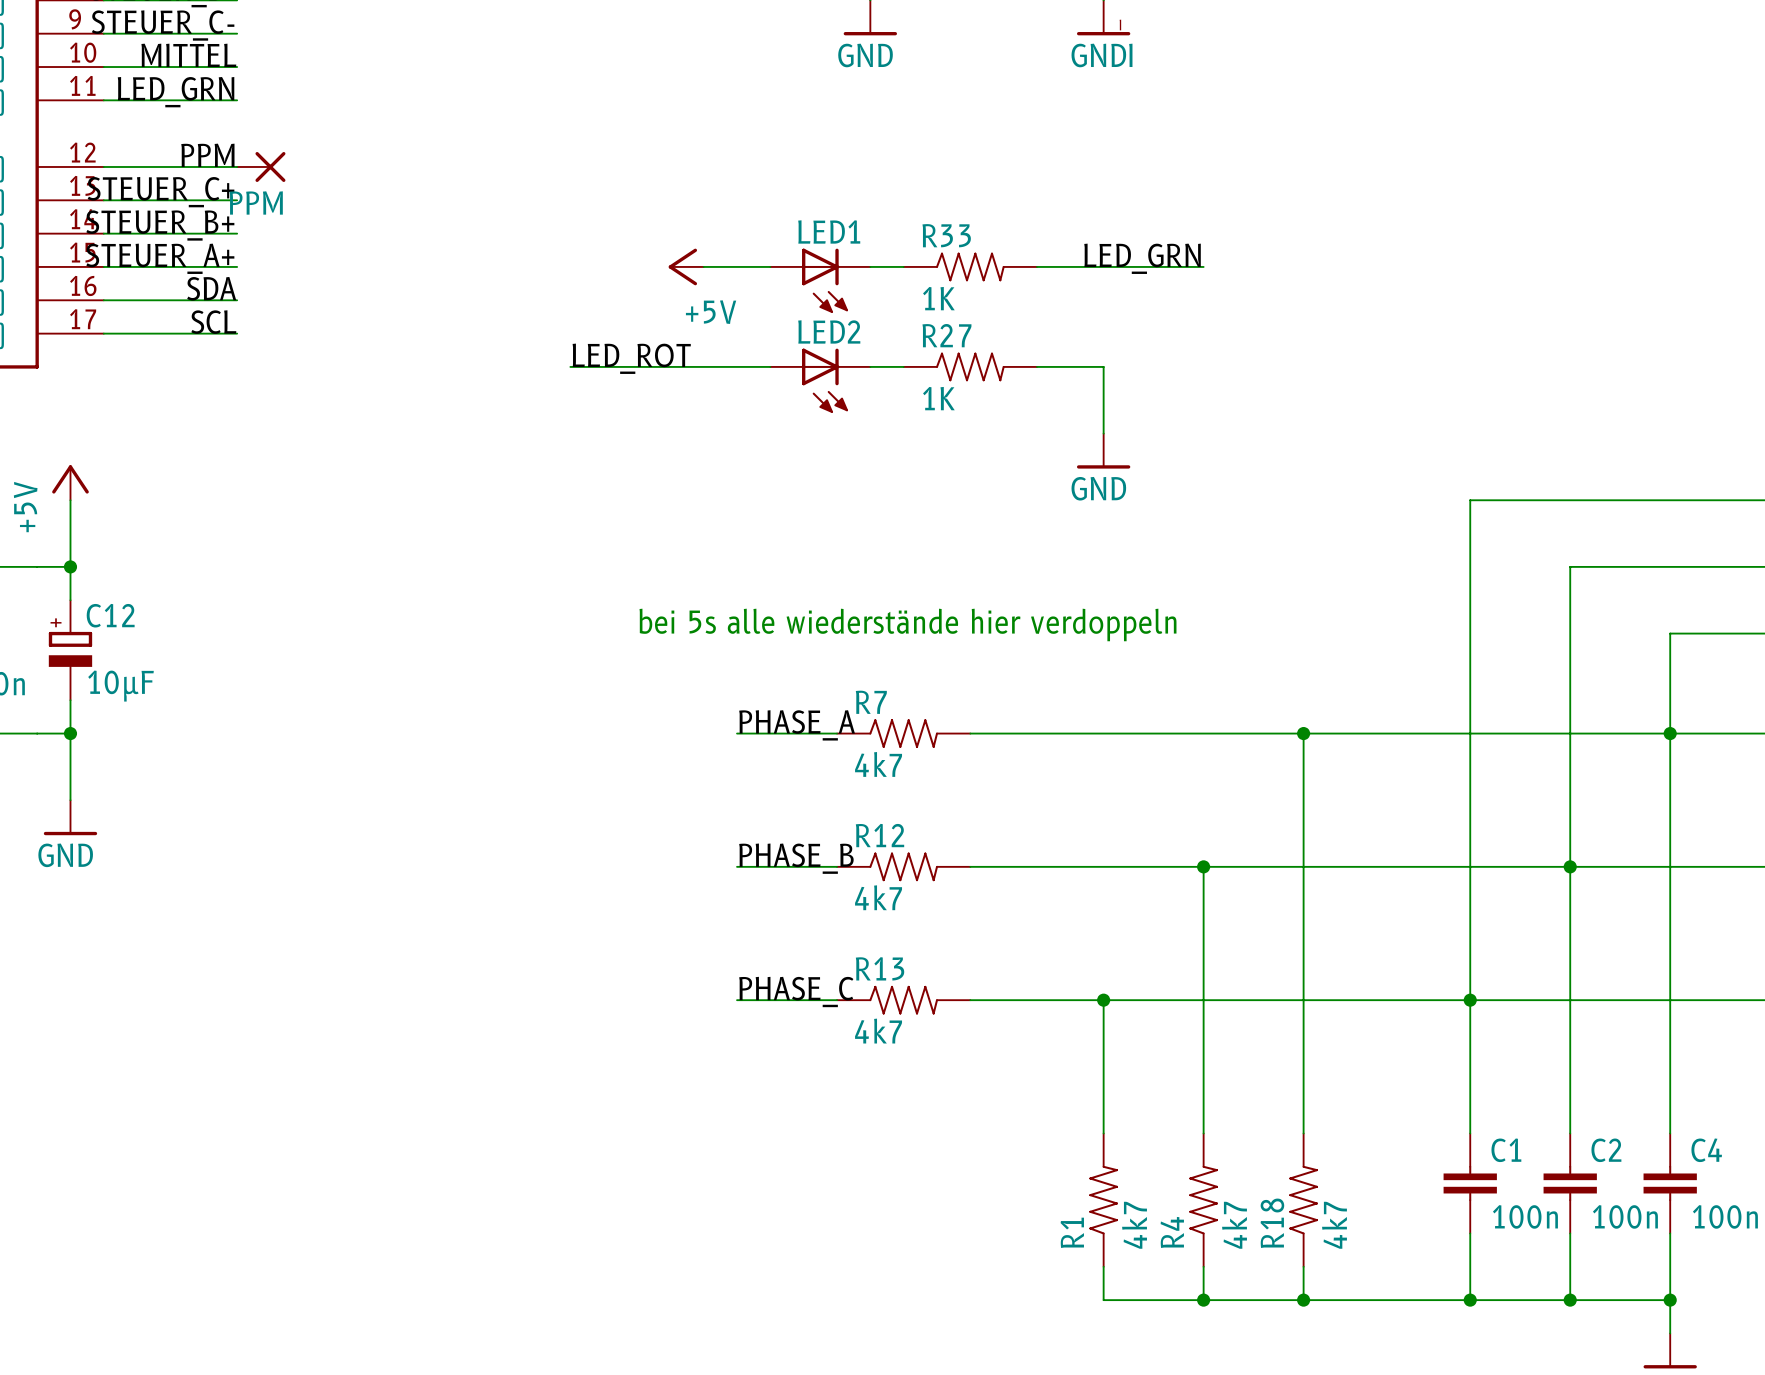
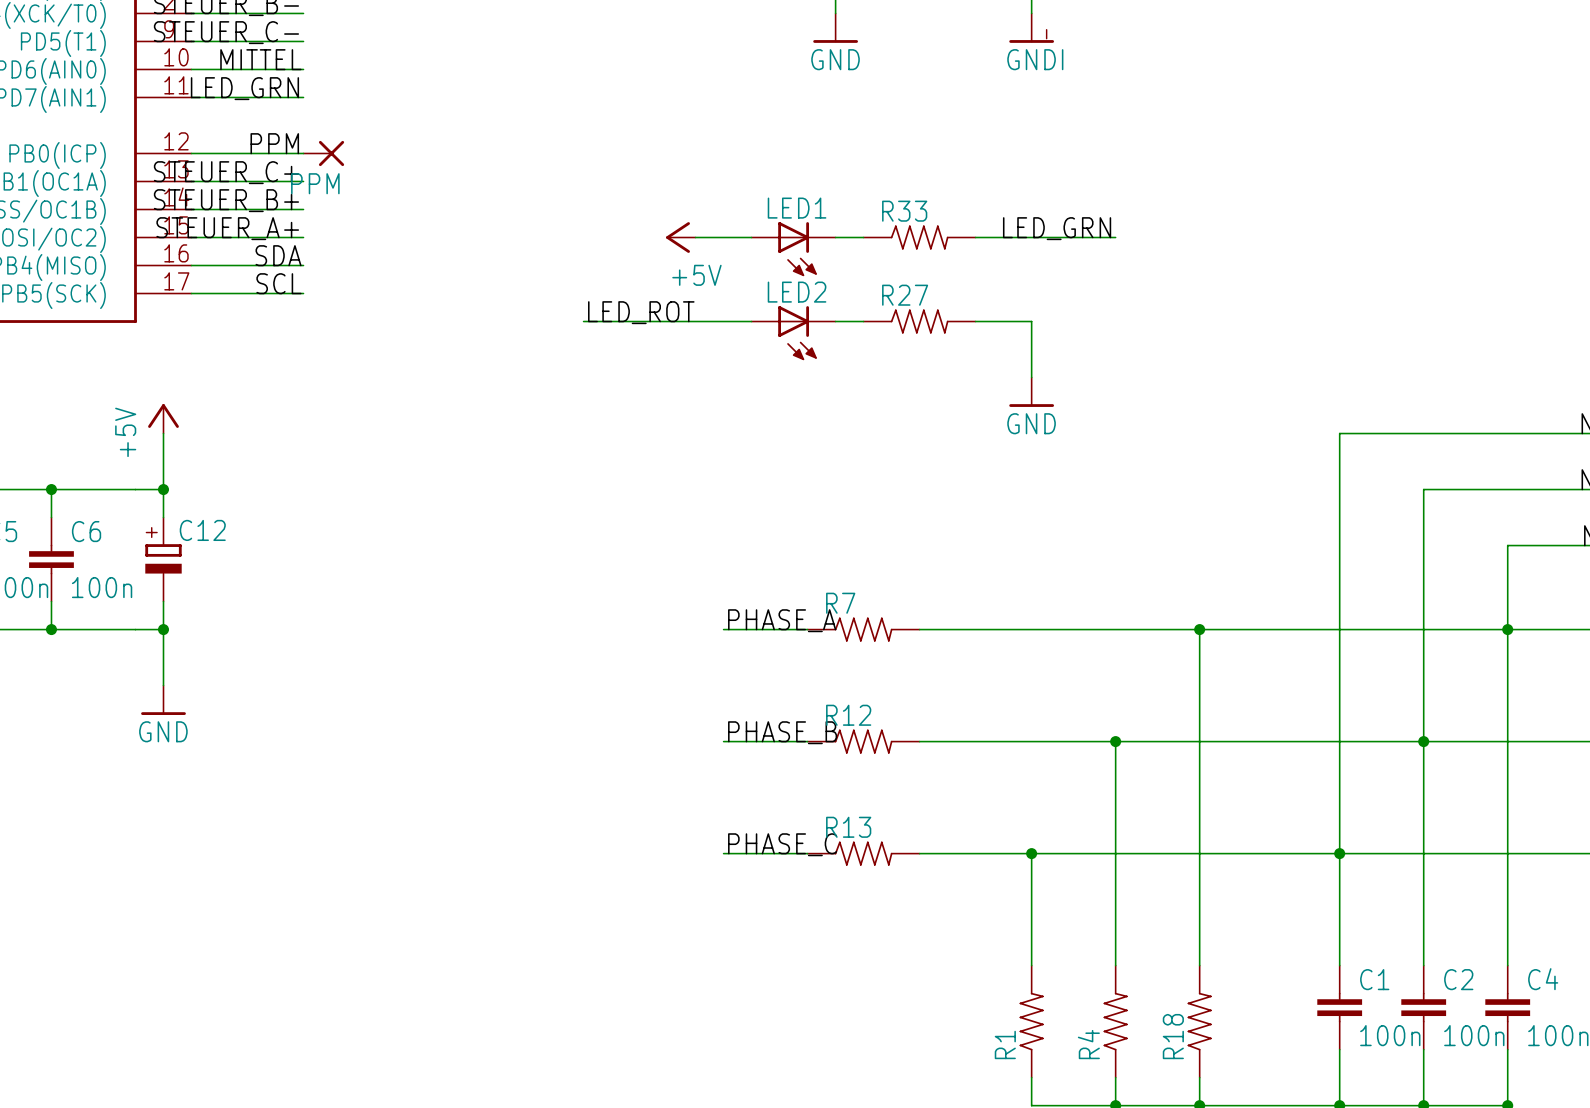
R33 value: 1K (938, 298) -> none
R27 value: 1K (938, 398) -> none
text: bei 5s alle wiederstände hier verdoppeln (908, 624) -> none
C12 value: 10µF (121, 686) -> none
R7 value: 4k7 (878, 764) -> none
R12 value: 4k7 (878, 897) -> none
R13 value: 4k7 (878, 1031) -> none
R1 value: 4k7 (1134, 1225) -> none
R4 value: 4k7 (1234, 1225) -> none
R18 value: 4k7 (1334, 1225) -> none

